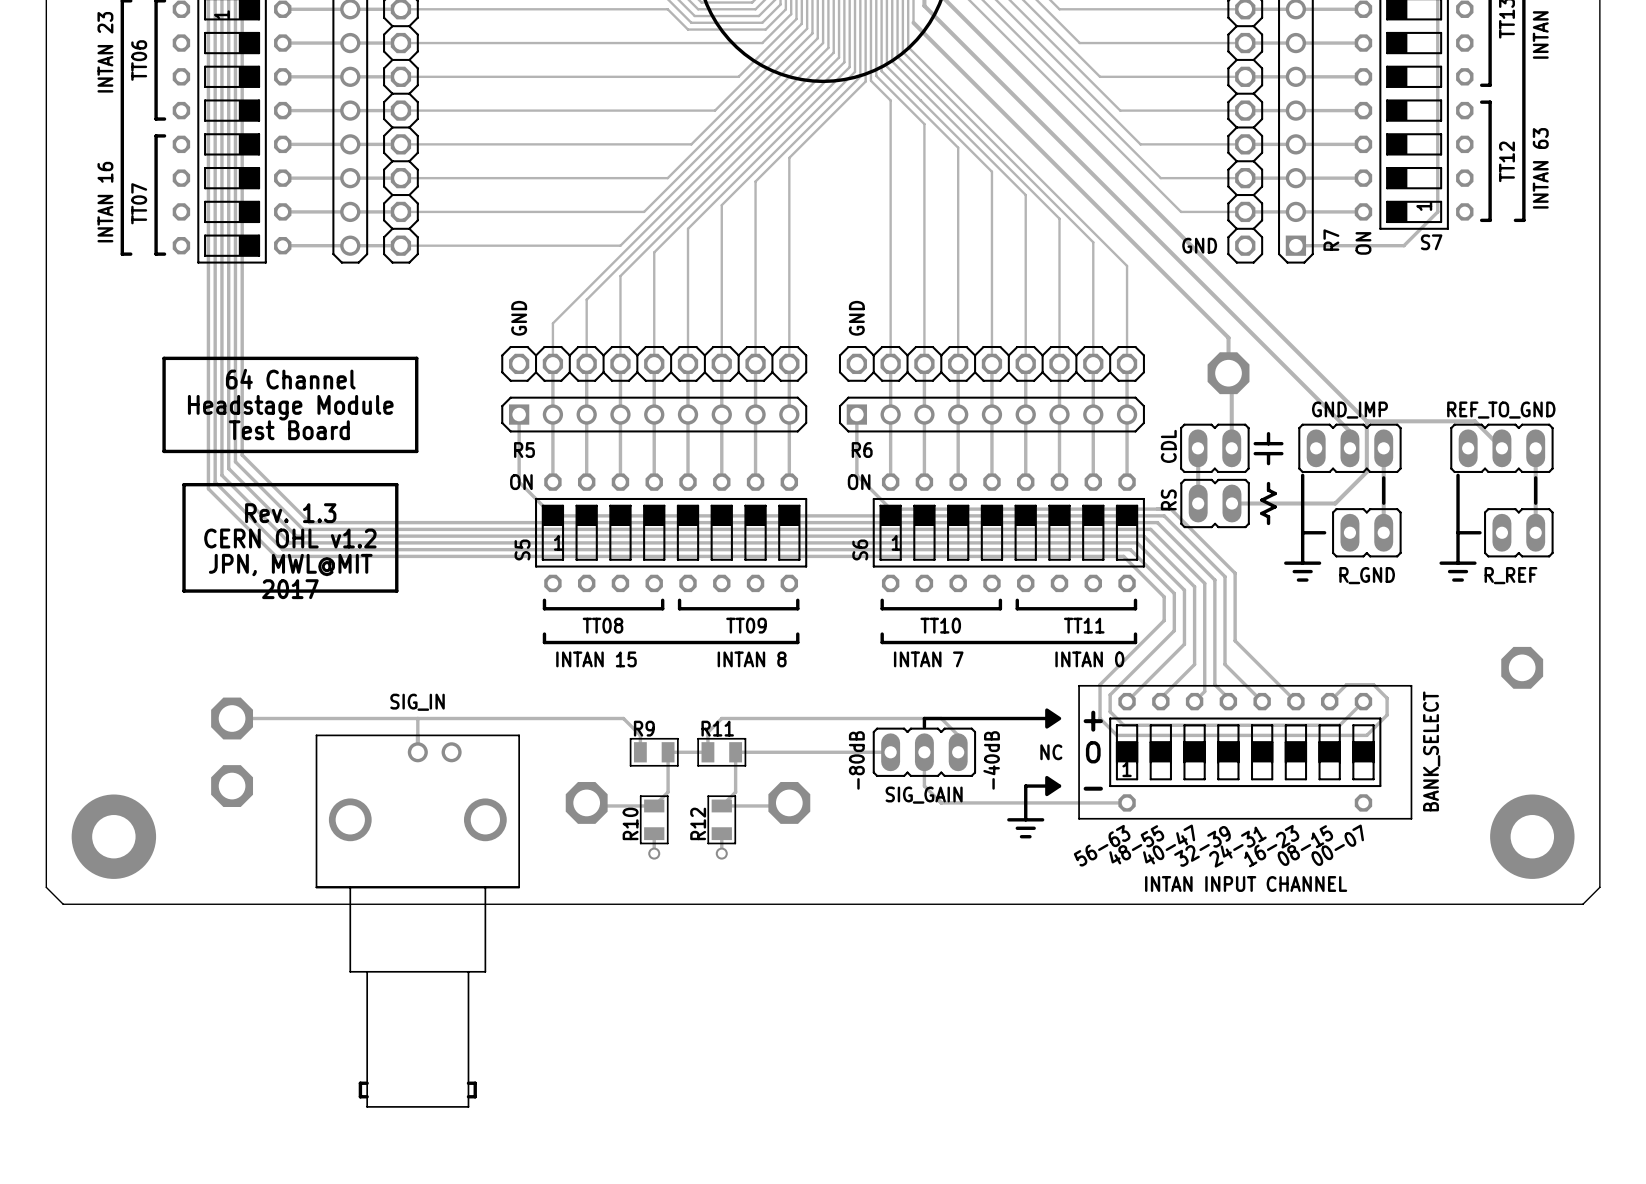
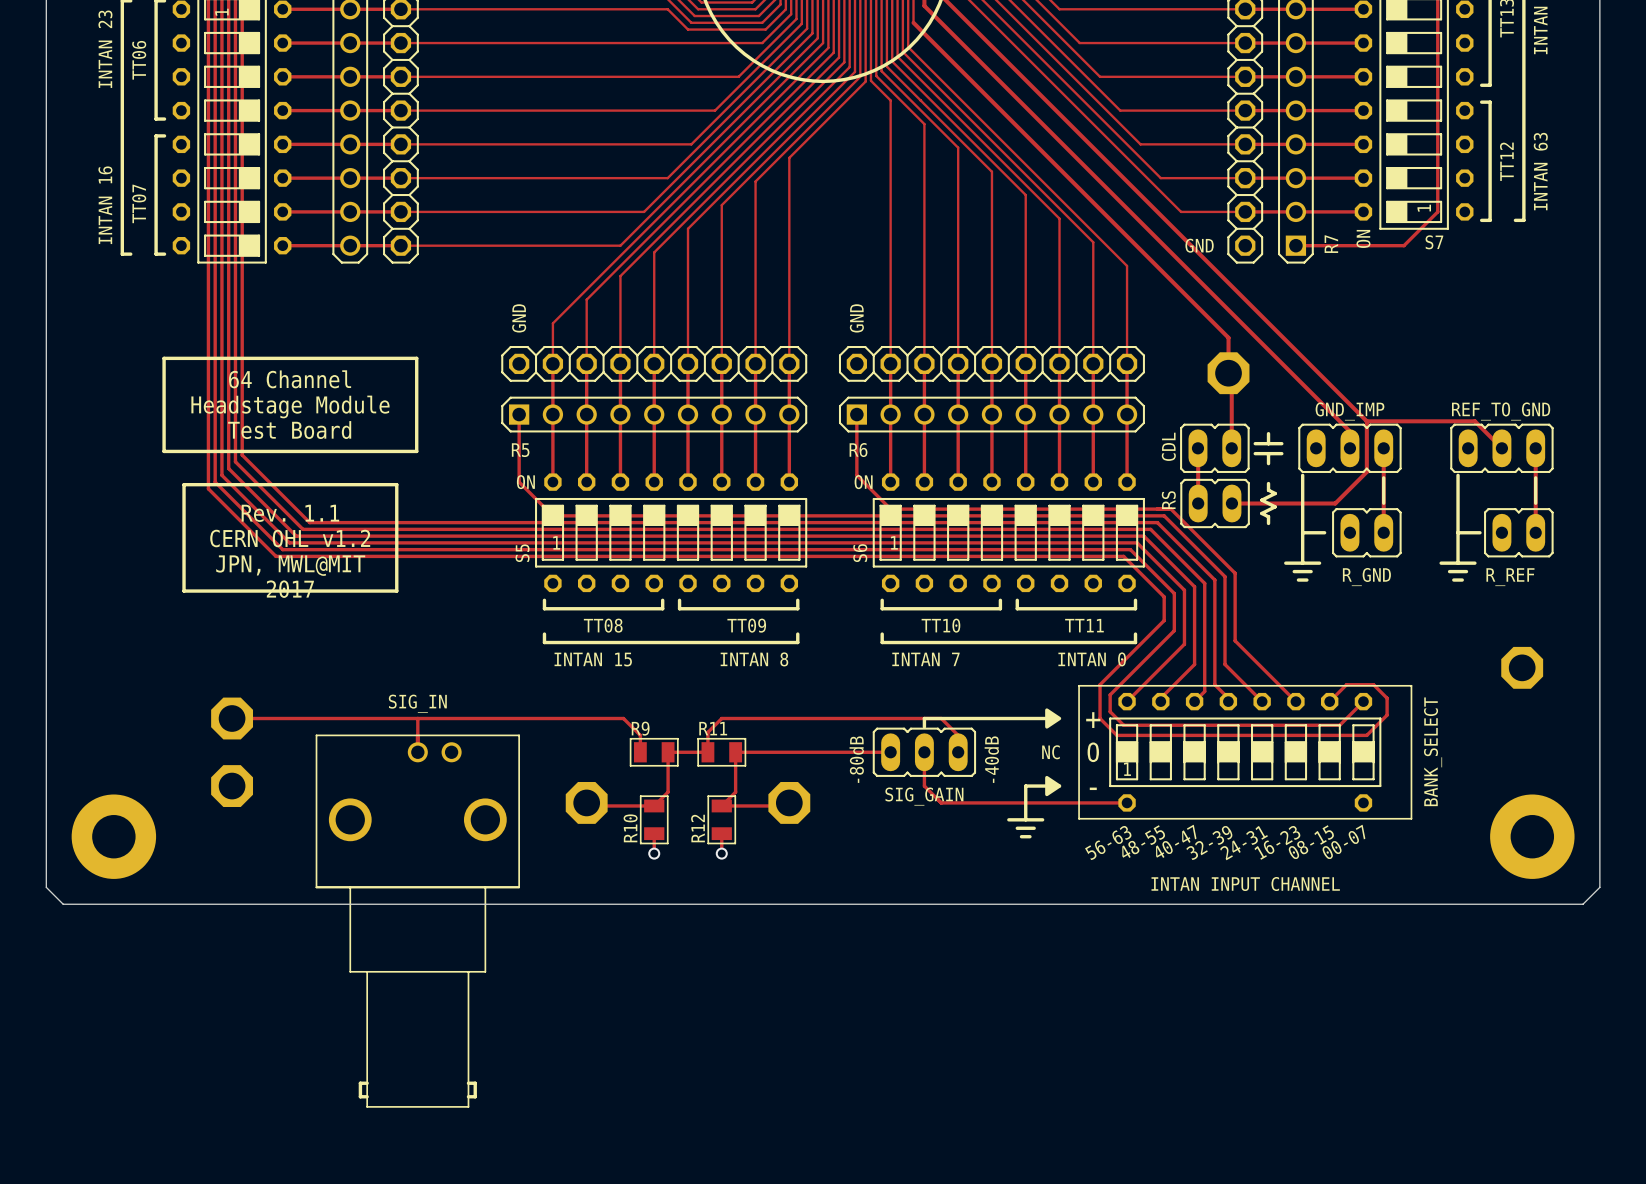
text: Rev. 1.3 (290, 513) -> Rev. 1.1 (290, 513)

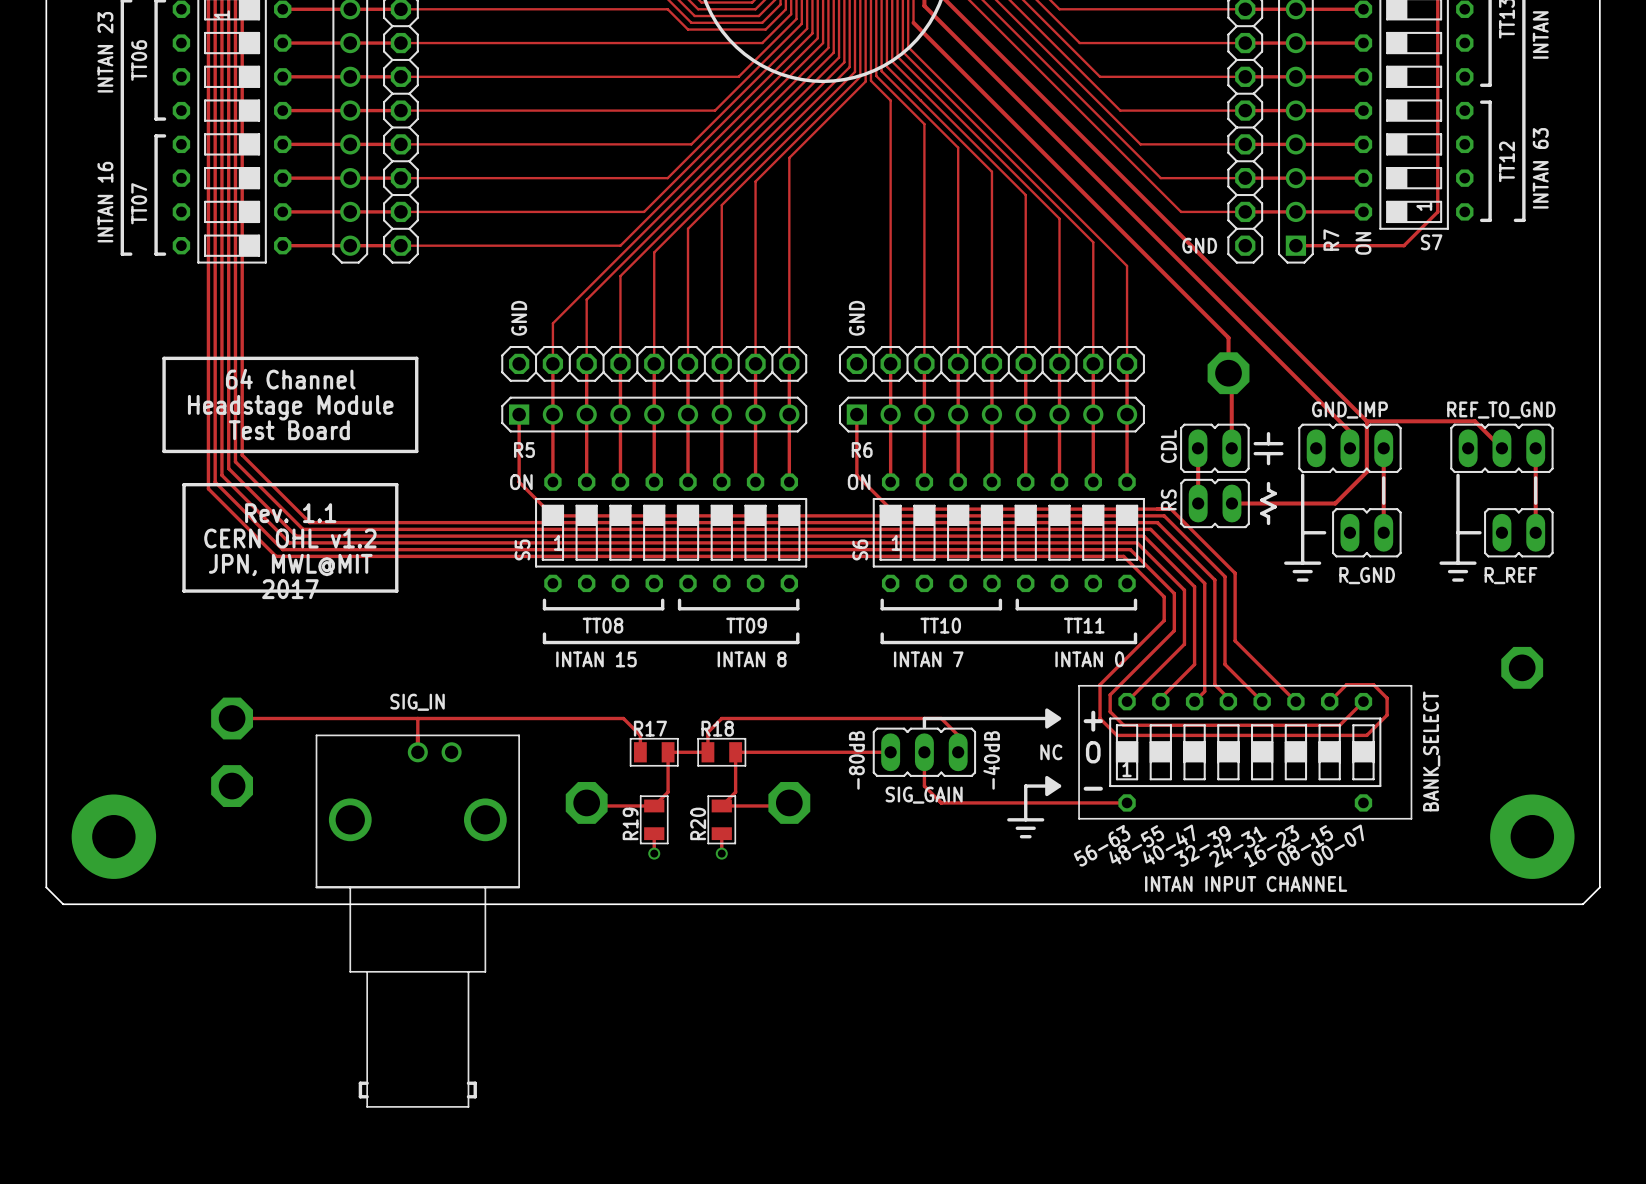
R9 name: R9 (640, 728) -> R17 (650, 728)
R11 name: R11 (713, 728) -> R18 (717, 728)
R10 name: R10 (630, 828) -> R19 (630, 823)
R12 name: R12 (698, 828) -> R20 (698, 823)

